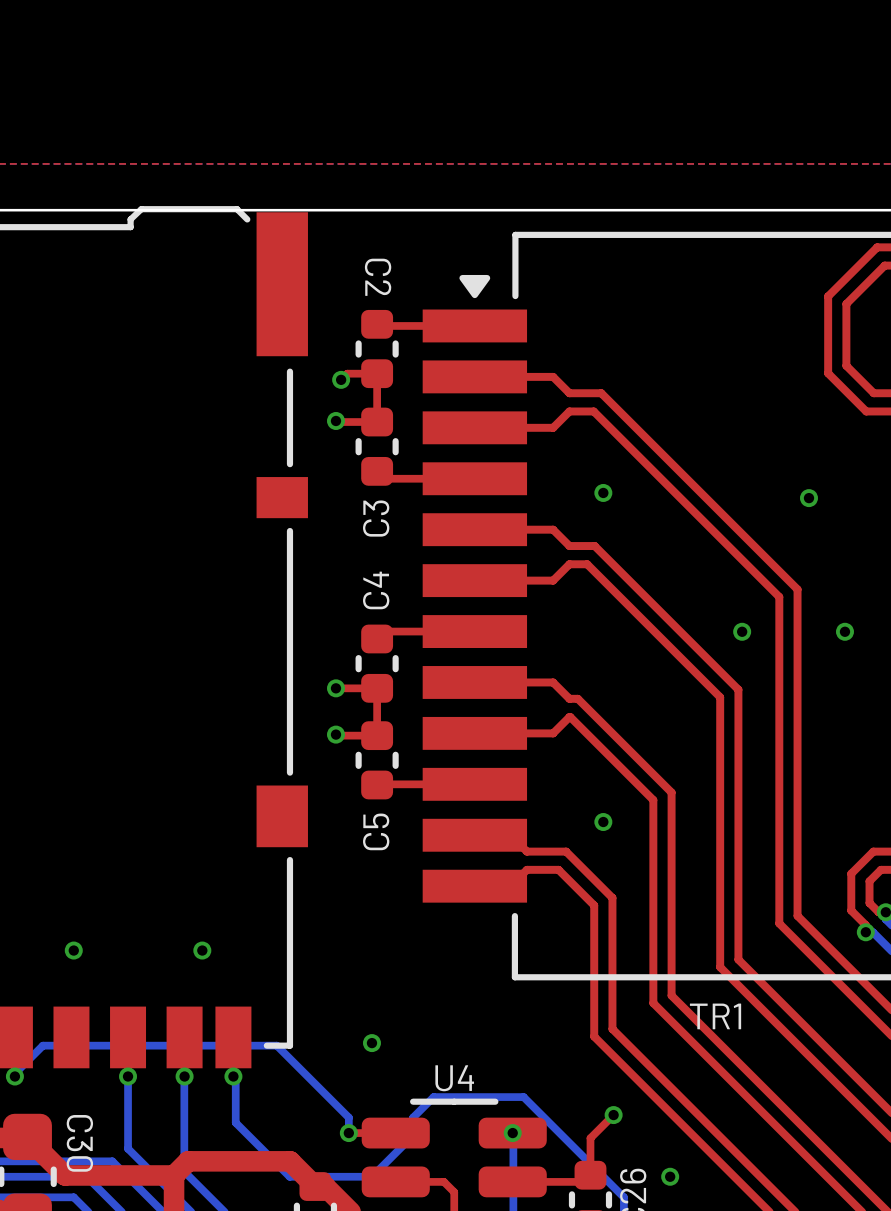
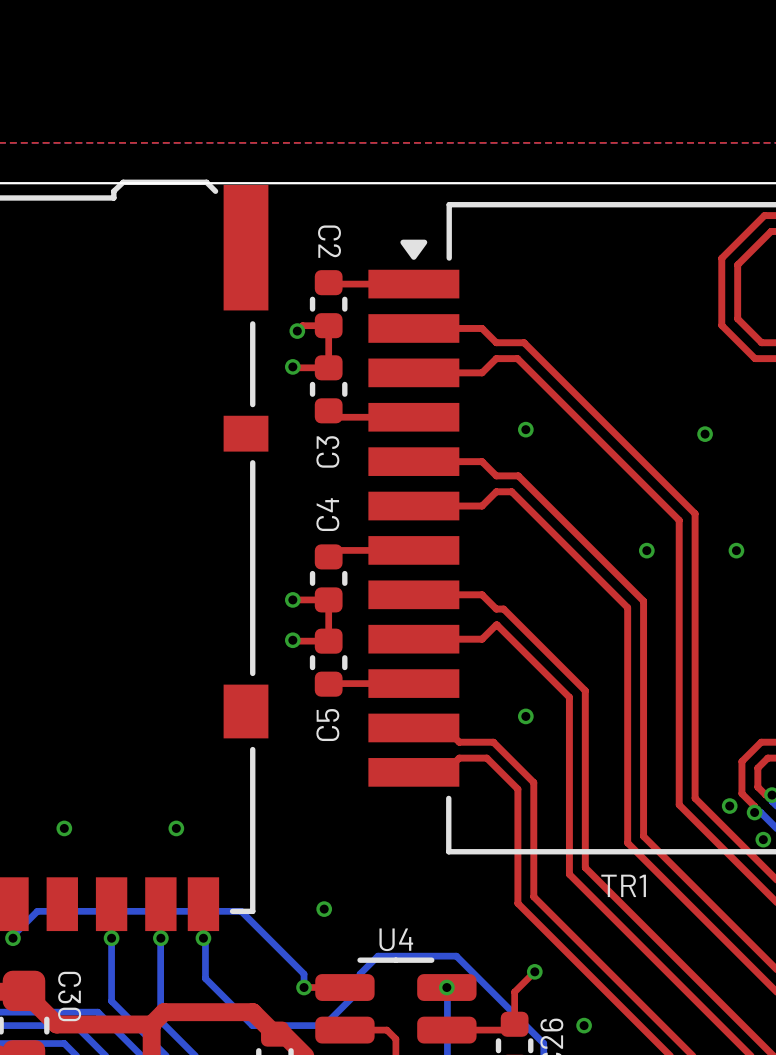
via: none -> (729, 806)
via: none -> (763, 839)

